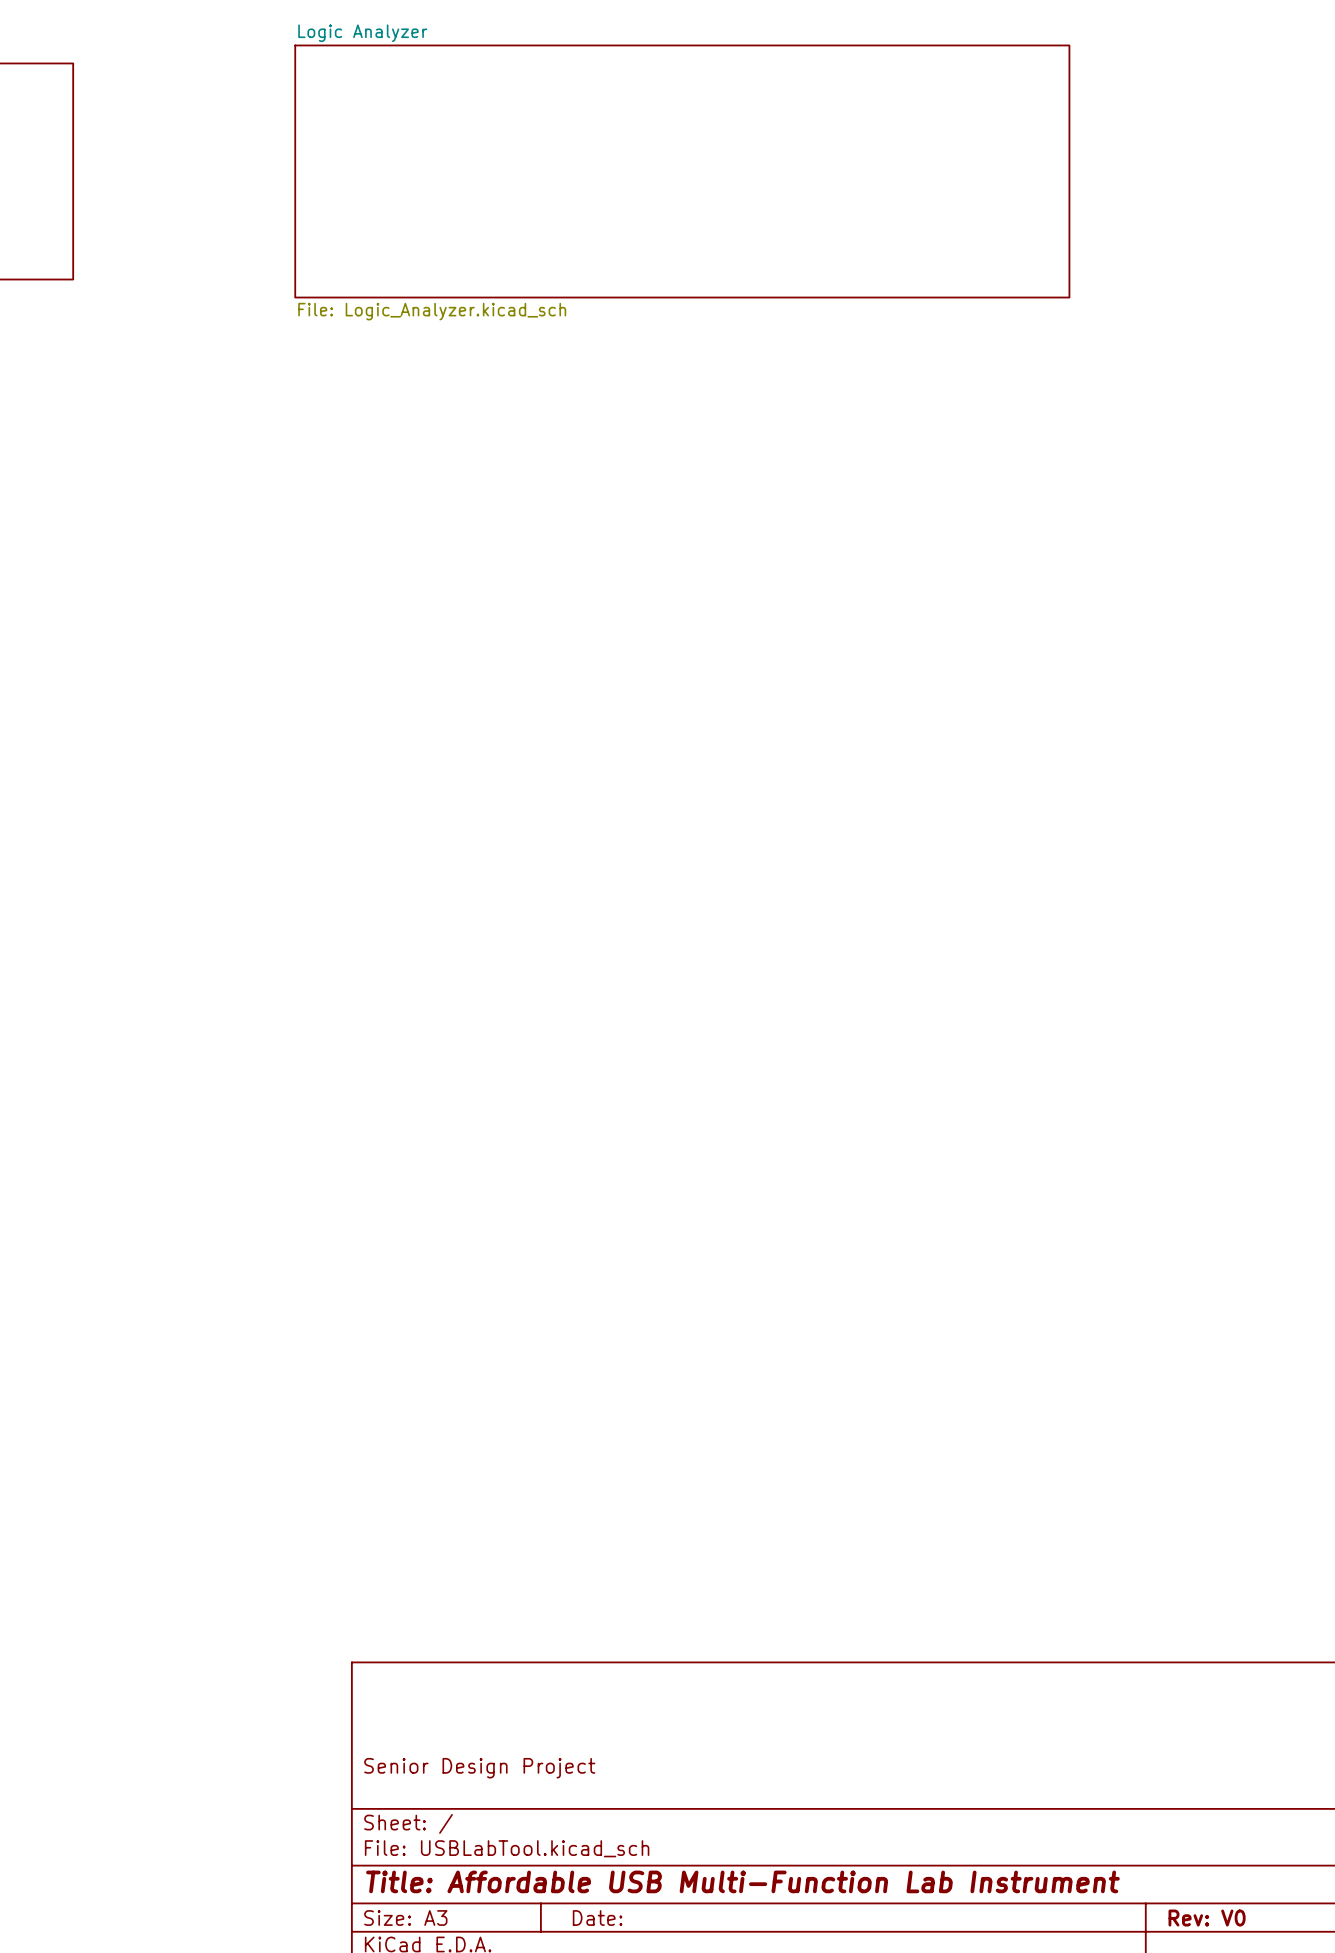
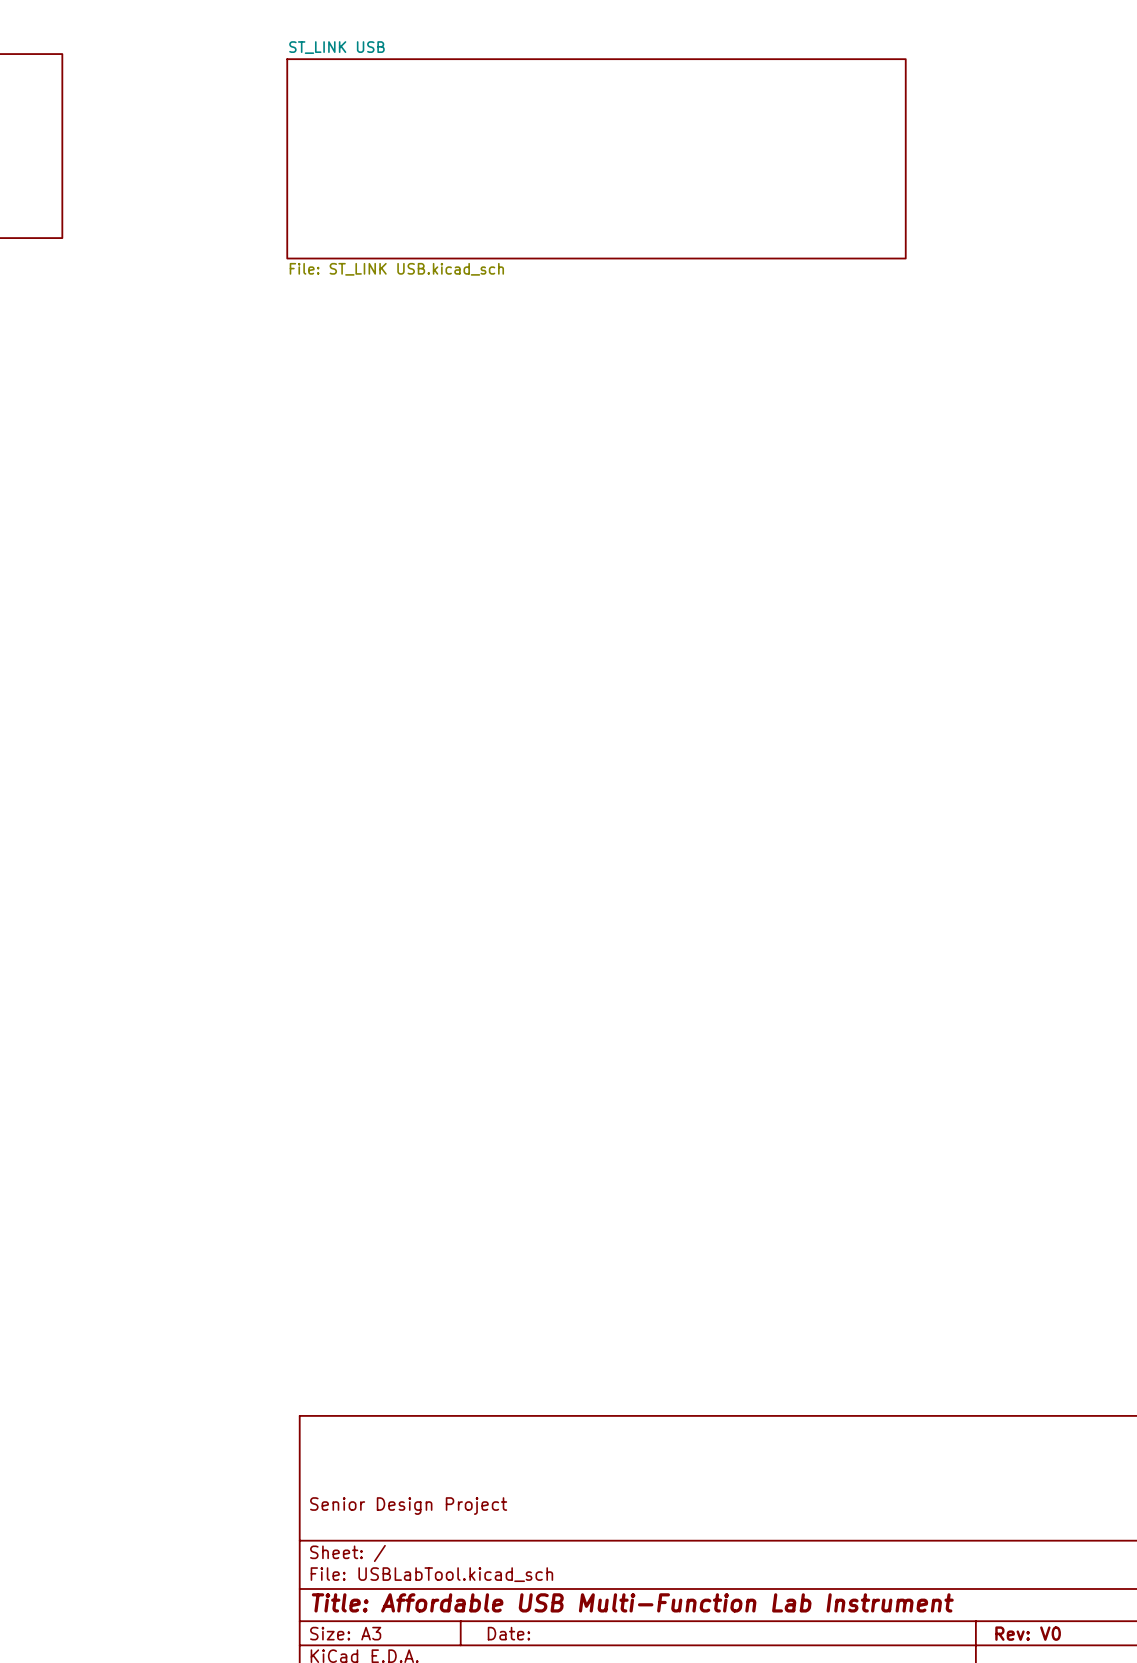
sheet Logic Analyzer: File: Logic_Analyzer.kicad_sch (682, 171) -> none
sheet ST_LINK USB: none -> File: ST_LINK USB.kicad_sch (596, 158)

